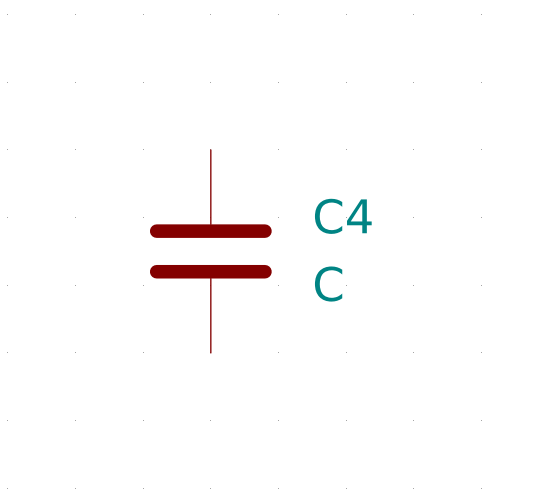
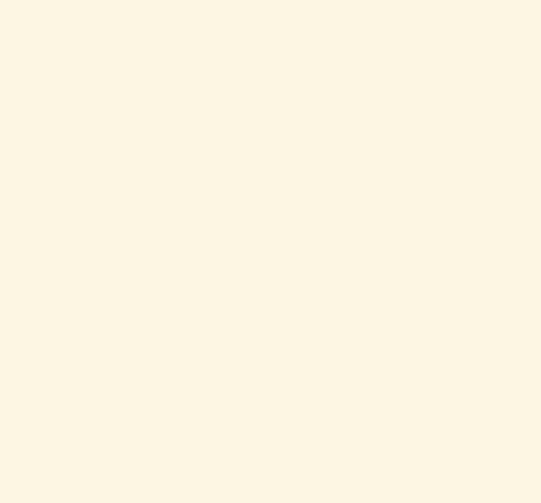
C4: C (210, 251) -> none

